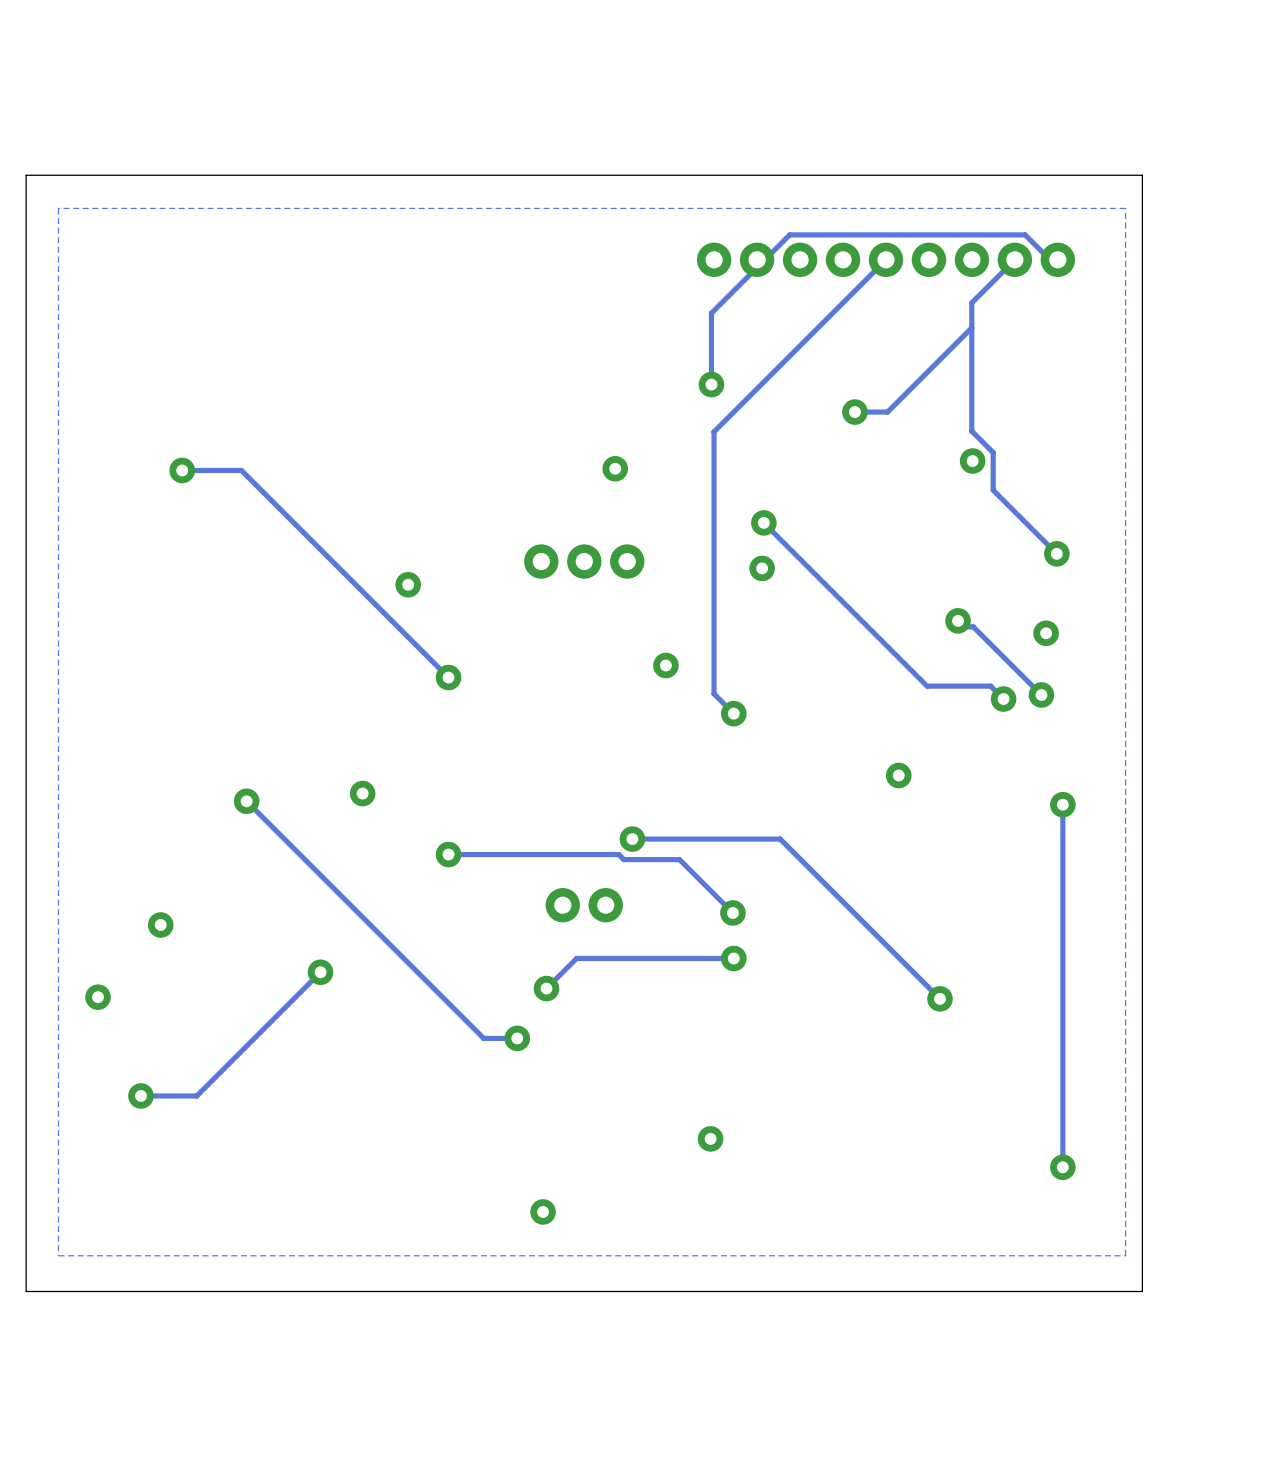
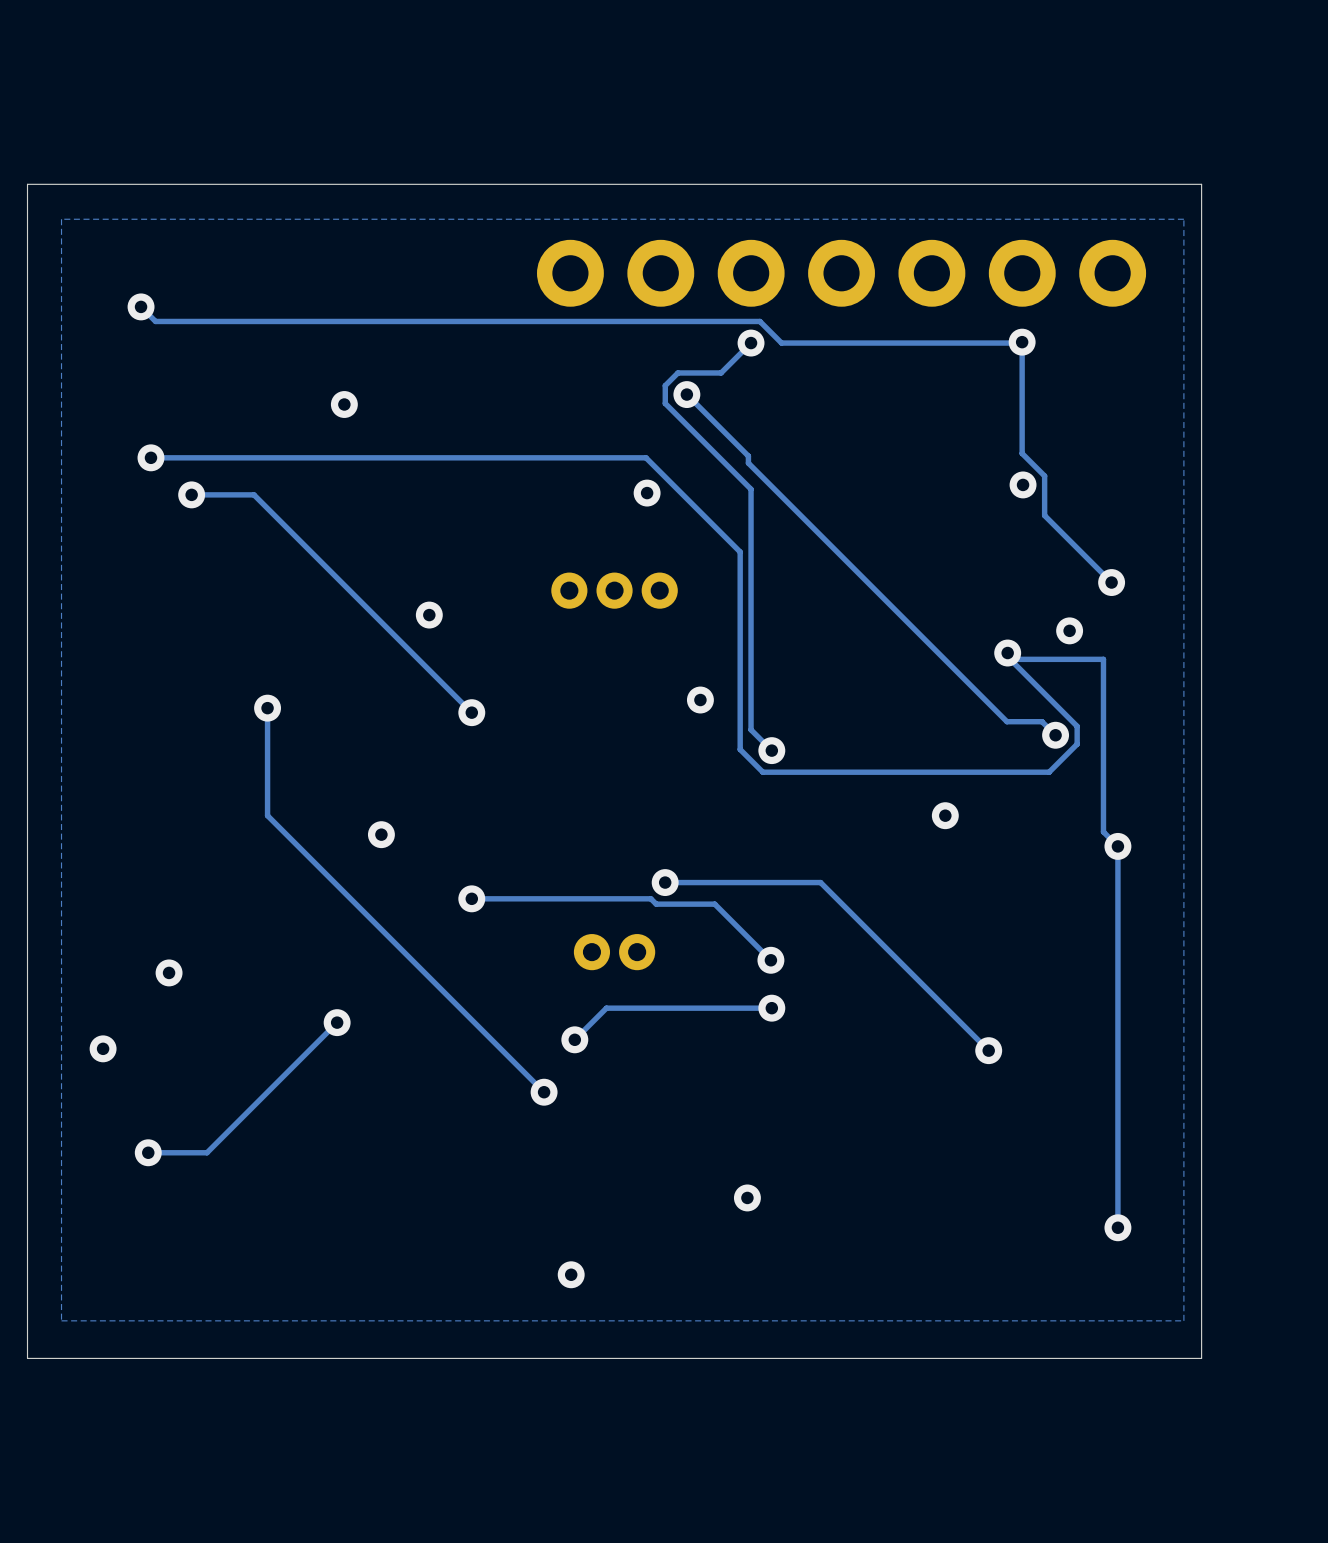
part: (735, 259) -> none
part: none -> (841, 273)
track: (885, 259) (714, 431) (714, 465) -> (751, 343) (721, 372) (677, 372) (665, 385) (665, 403) (751, 489)
part: (928, 259) -> none
track: (1014, 259) (971, 302) (971, 325) -> (141, 306) (155, 321) (759, 321) (781, 343) (1022, 343)
track: (1057, 259) (1050, 259) (1025, 234) (789, 234) (711, 313) (711, 384) -> none
via: none -> (141, 306)
via: none -> (1022, 342)
via: none -> (751, 343)
track: (971, 327) (887, 412) (854, 412) -> none
via: none -> (686, 394)
via: none -> (344, 404)
via: (711, 384) -> none
via: (854, 412) -> none
track: none -> (150, 457) (646, 457) (740, 552) (740, 749) (762, 772) (1049, 772) (1077, 744) (1077, 726) (1007, 656) (1007, 653)
via: none -> (150, 457)
track: (763, 522) (927, 686) (957, 686) -> (686, 394) (748, 456) (748, 463) (1006, 721)
via: (763, 522) -> none
via: (762, 568) -> none
track: (973, 626) (1041, 695) -> (1023, 659) (1103, 659) (1103, 831) (1117, 846)
via position: (1046, 633) -> (1069, 630)
via: (1041, 695) -> none
track: (246, 801) (483, 1038) (517, 1038) -> (267, 708) (267, 815) (544, 1092)
via position: (246, 801) -> (267, 708)

